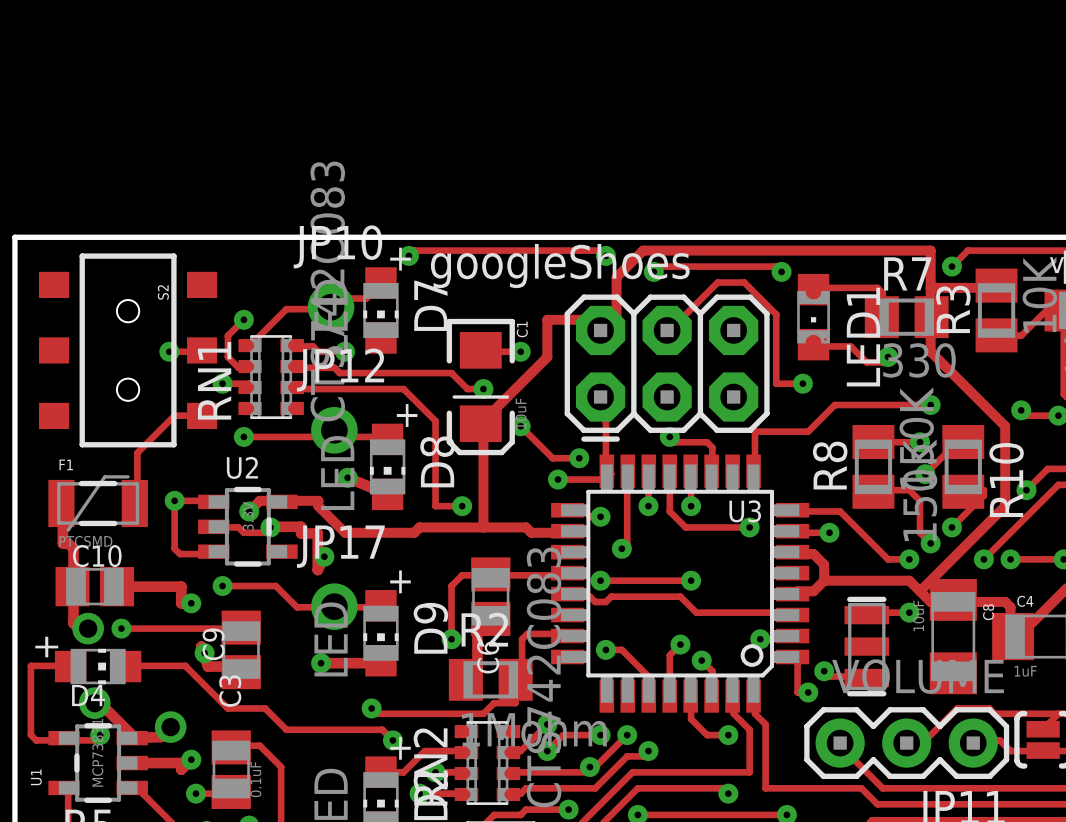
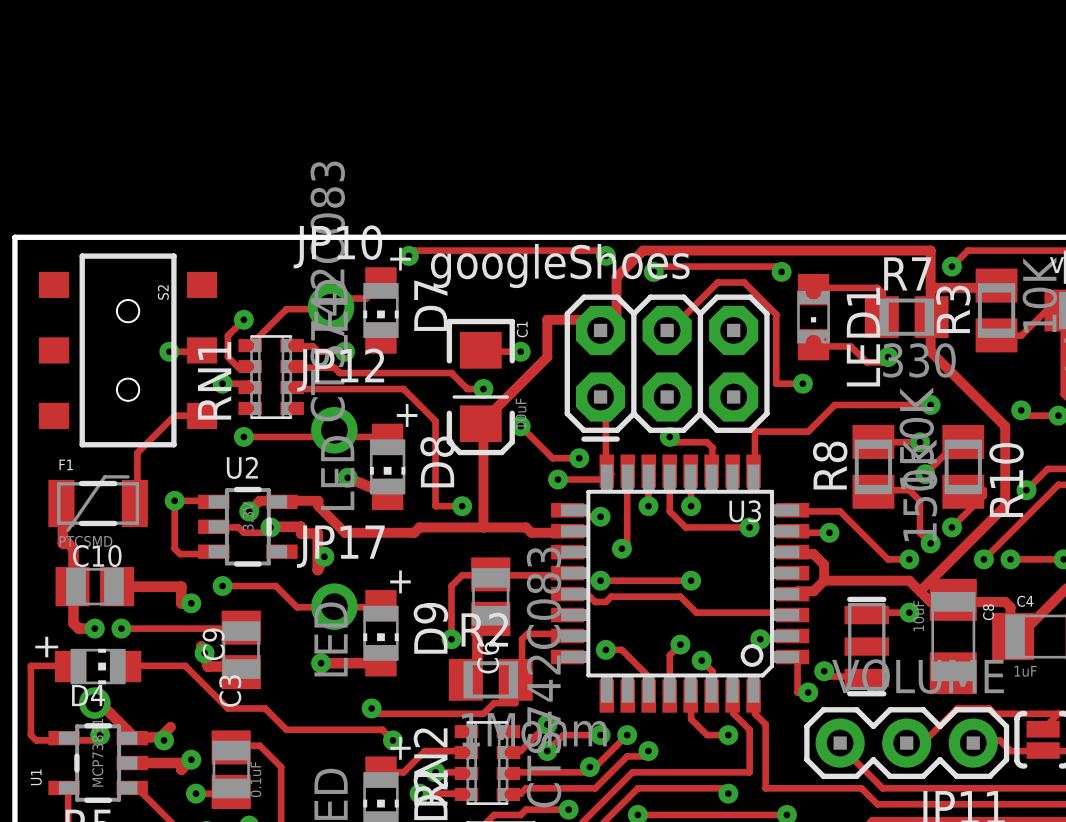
via size: [72, 612, 104, 645] -> [84, 618, 105, 639]
via size: [154, 711, 187, 743] -> [154, 730, 175, 751]

